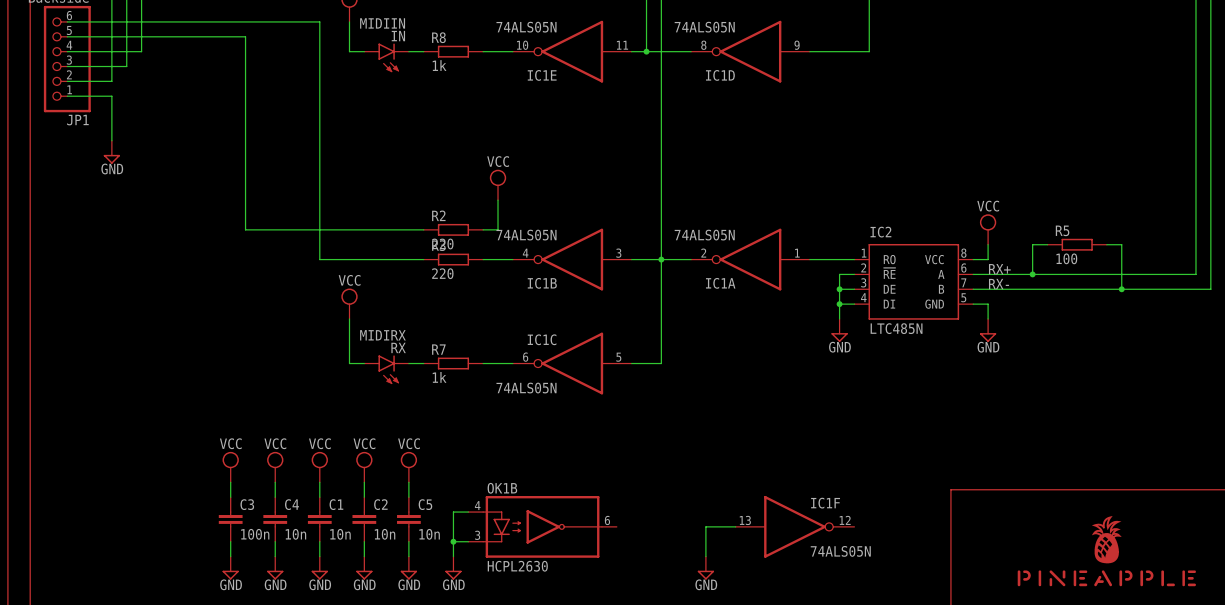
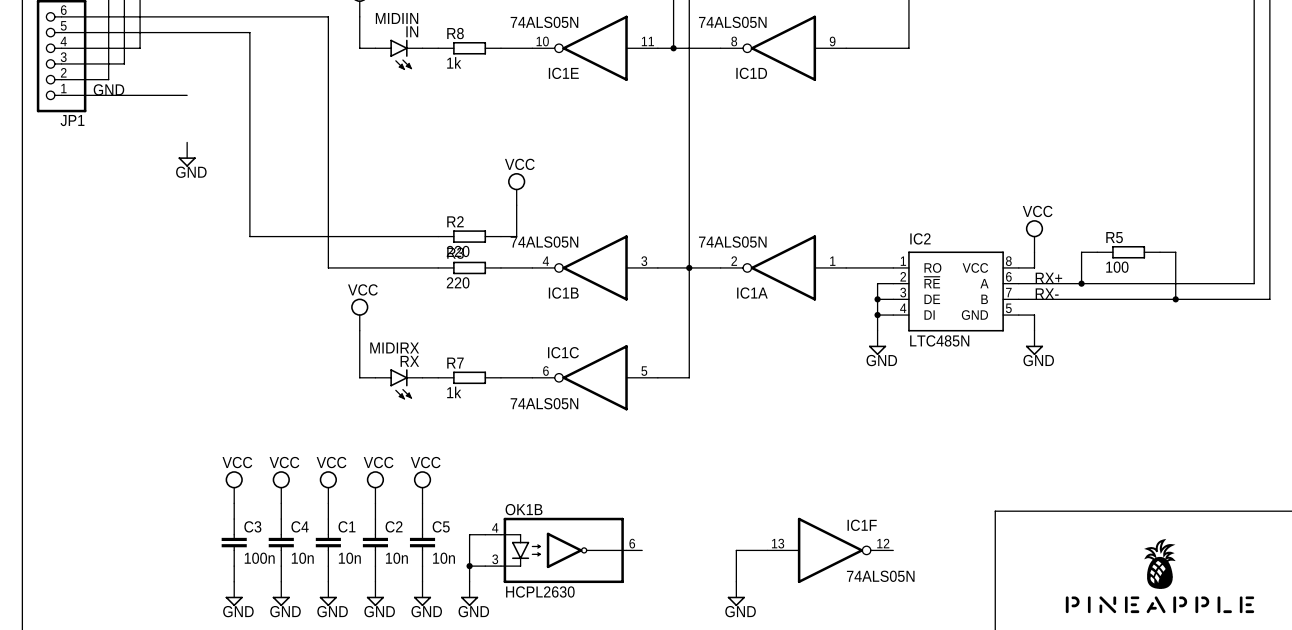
label: none -> GND (108, 89)
wire: (111, 96) (111, 140) -> (108, 95) (187, 95)
power symbol position: GND (111, 152) -> GND (187, 154)

